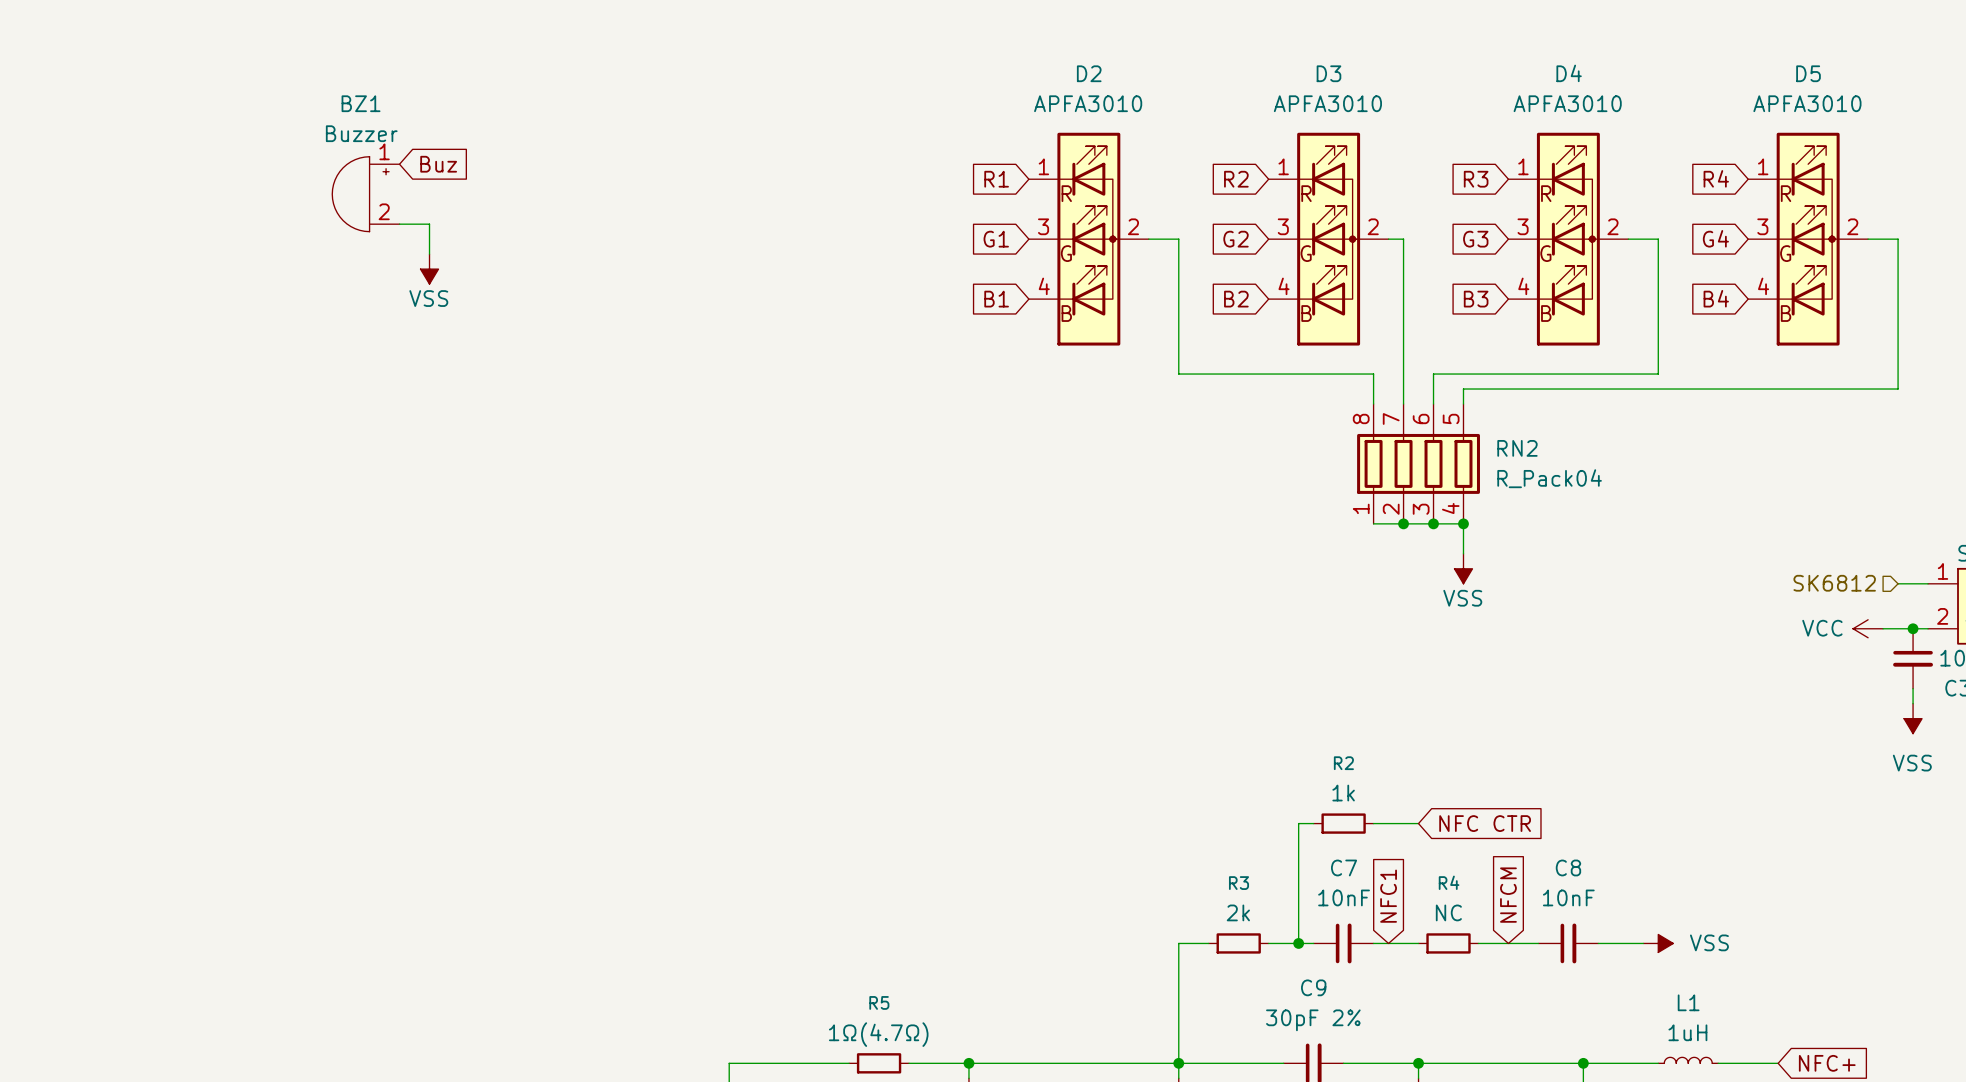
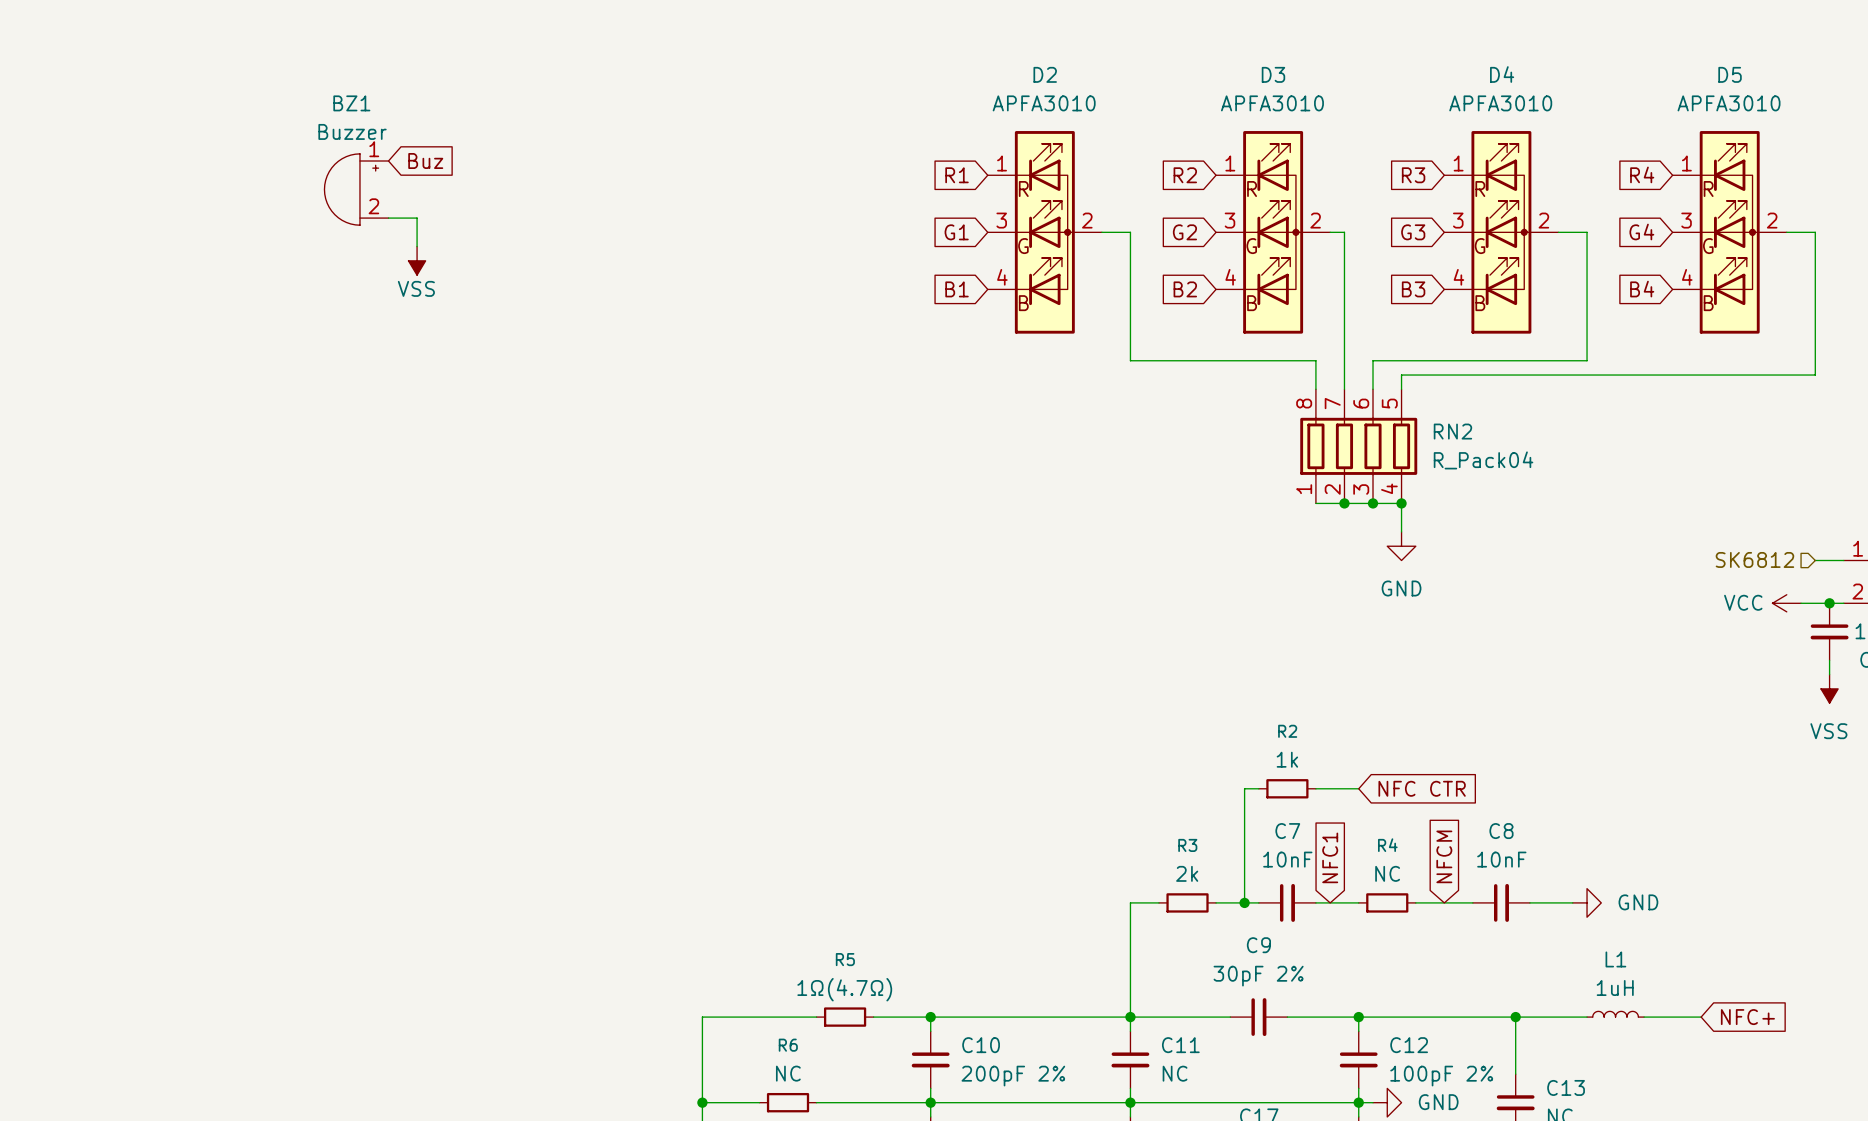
power symbol: VSS (1463, 568) -> GND (1401, 546)
power symbol: VSS (1658, 943) -> GND (1587, 902)

